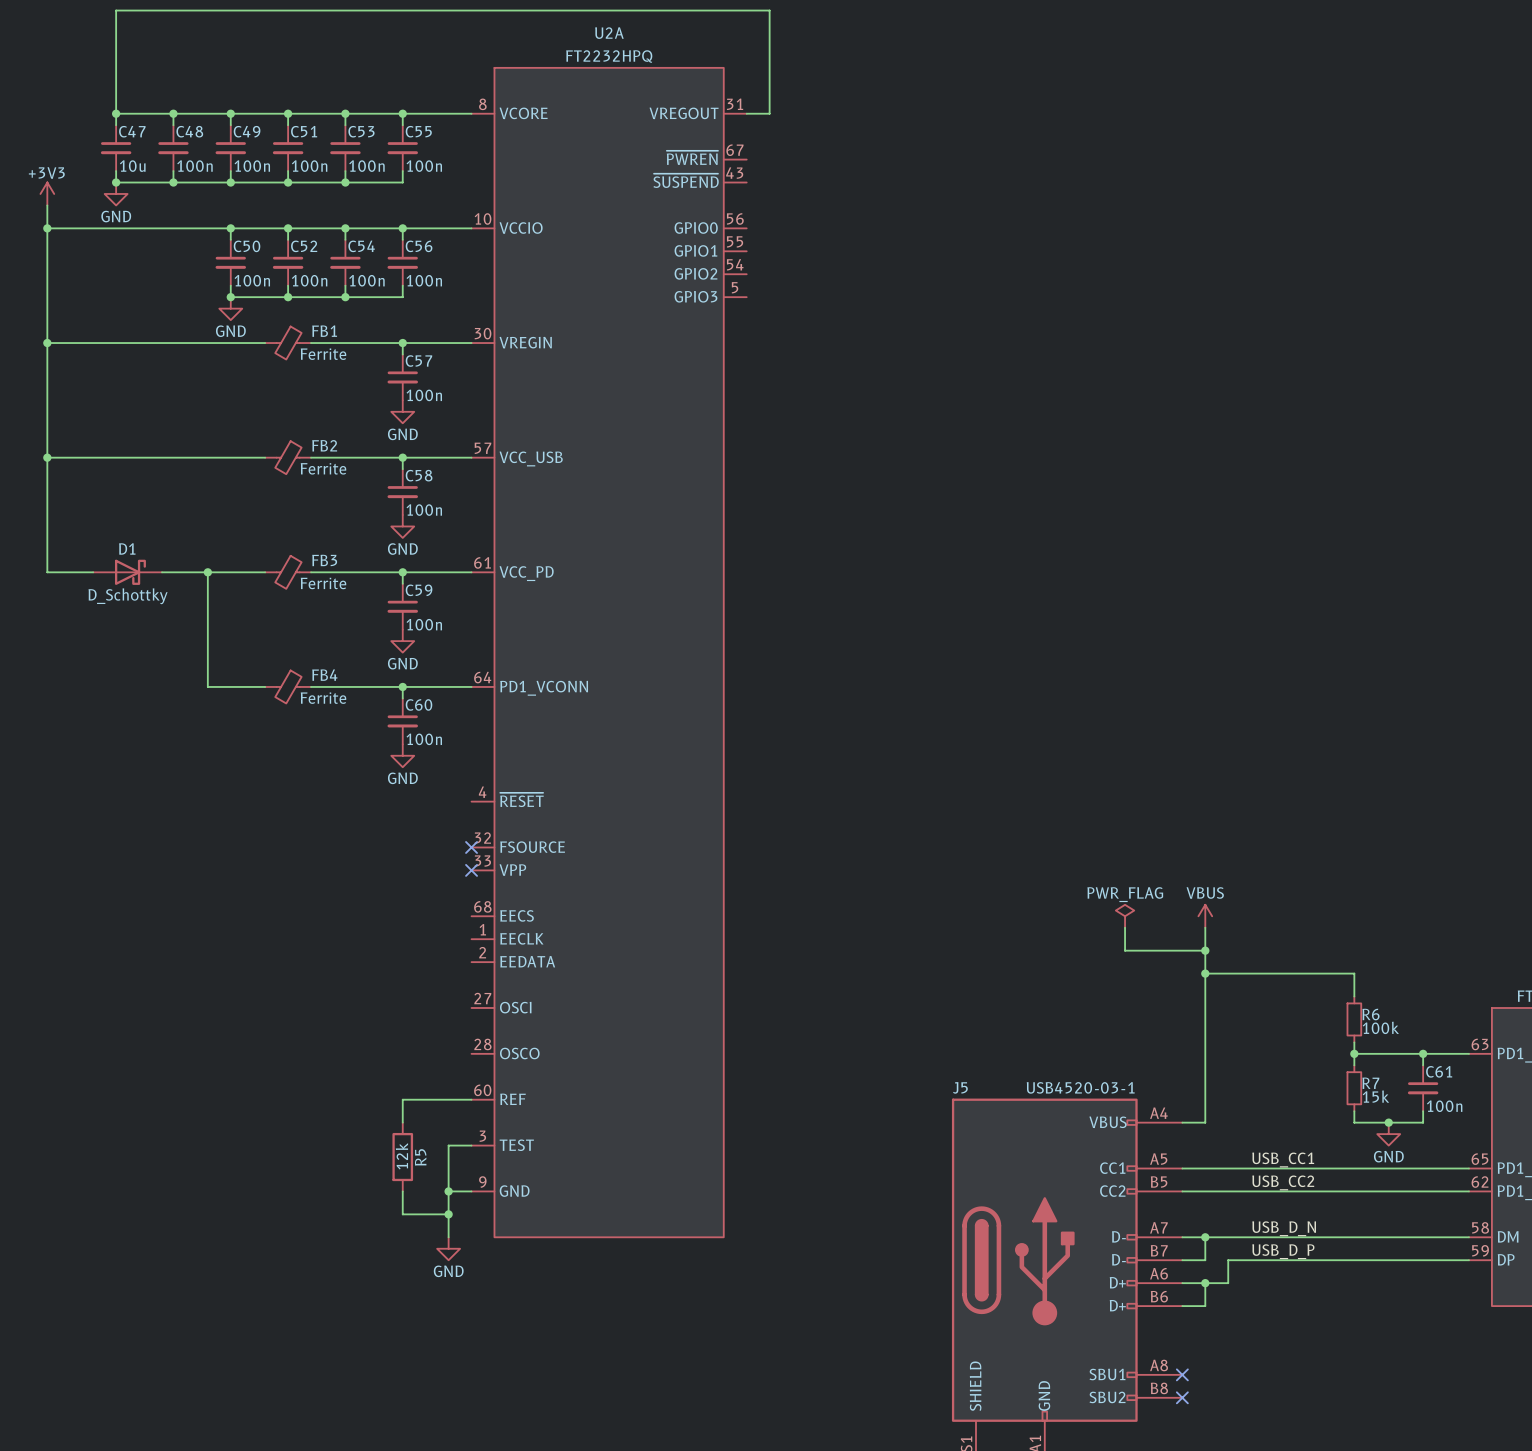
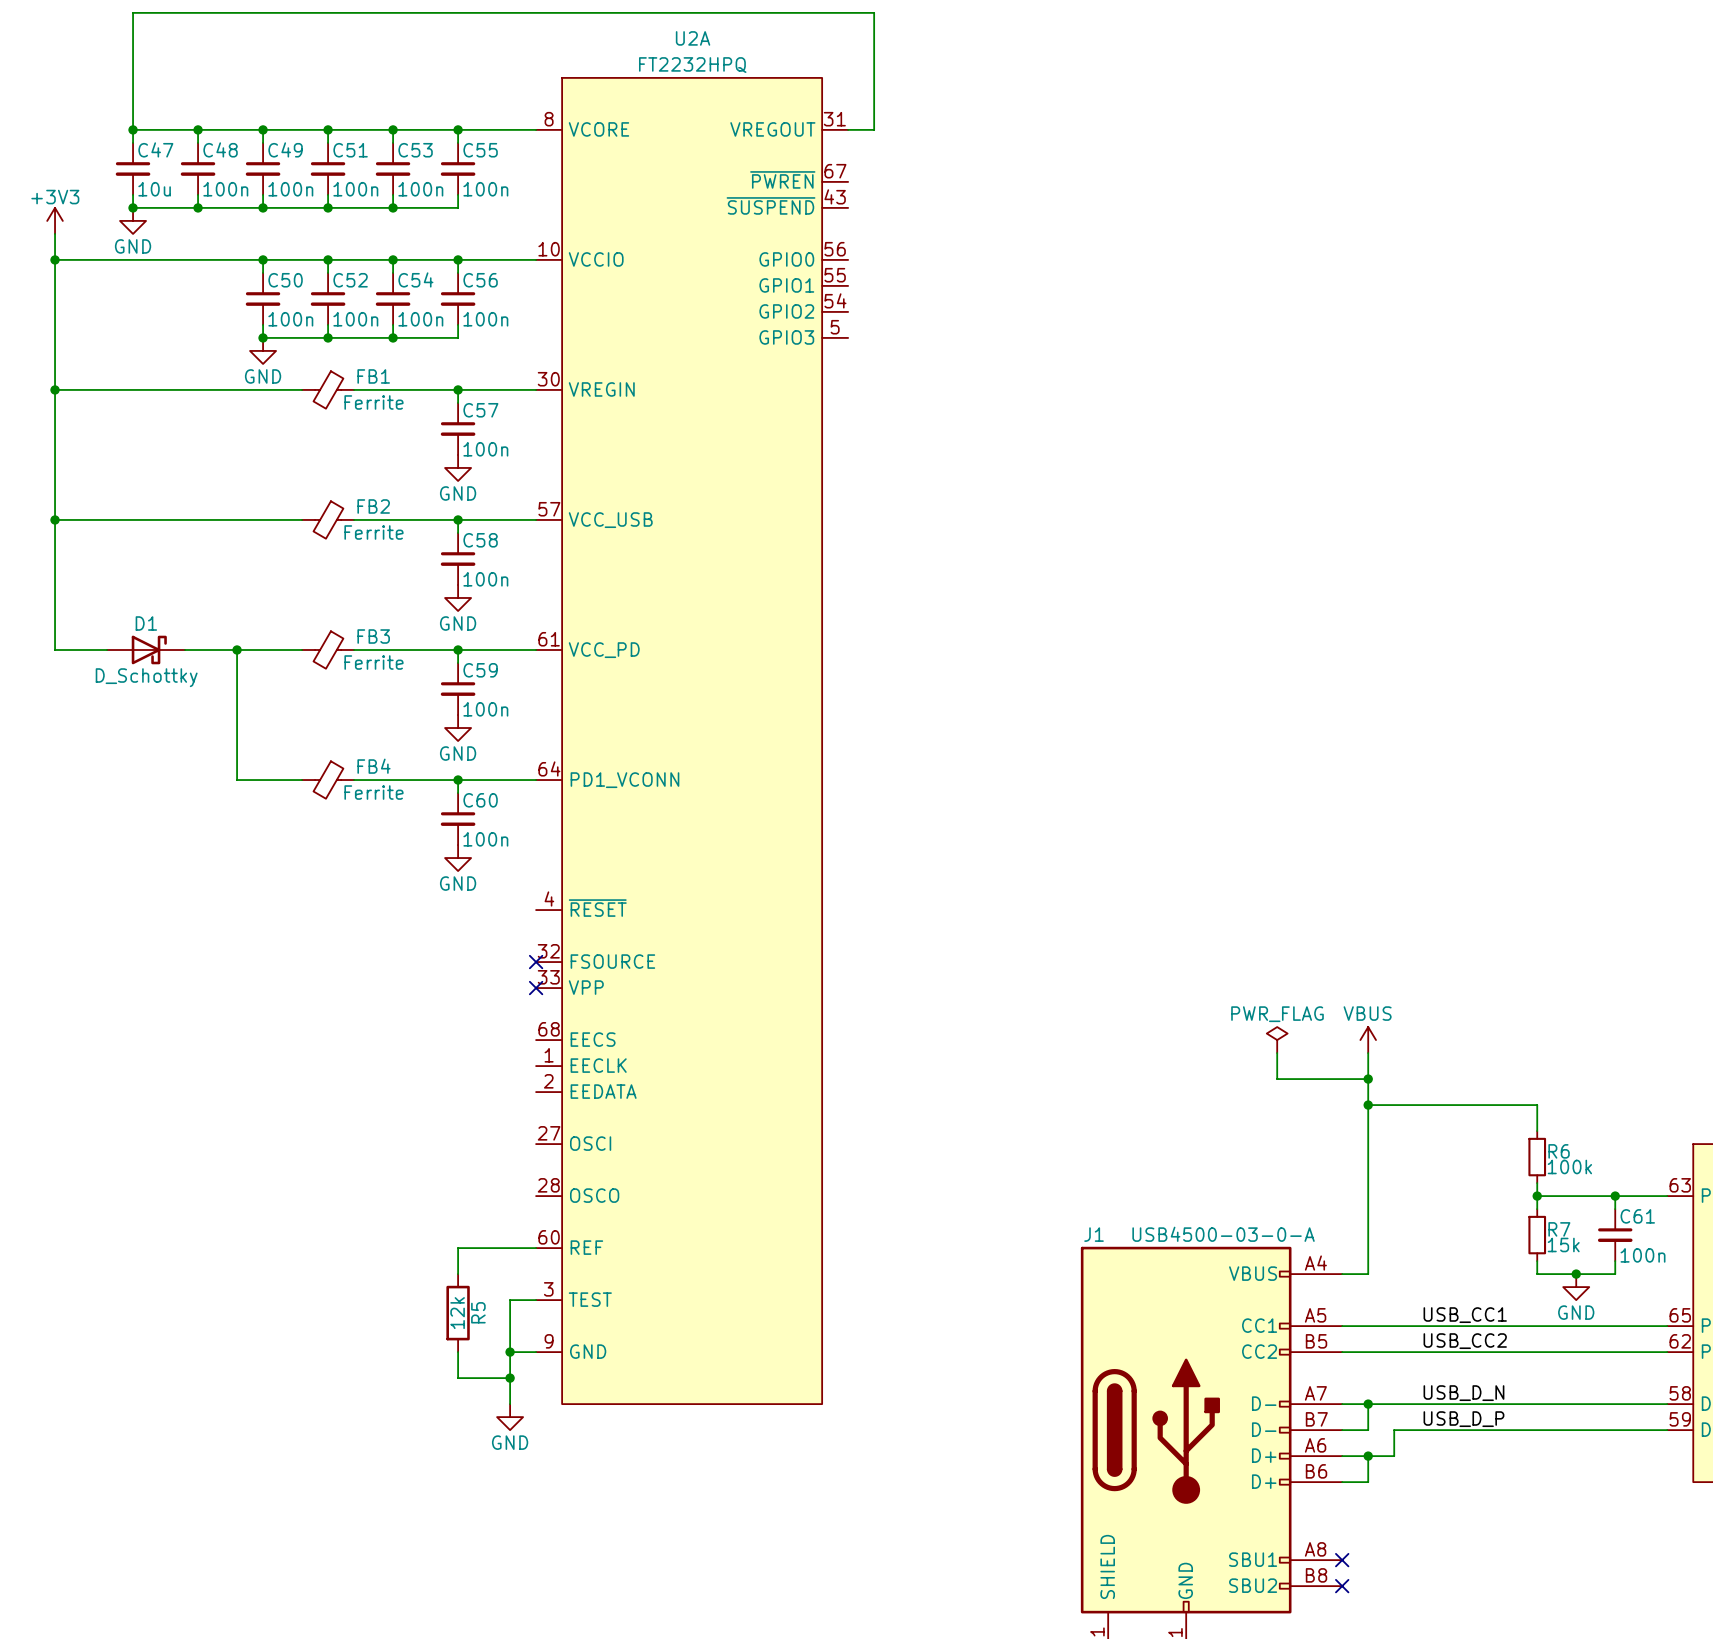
J5 name: J5 (960, 1087) -> J1 (1094, 1234)
J5 value: USB4520-03-1 (1080, 1087) -> USB4500-03-0-A (1223, 1234)

